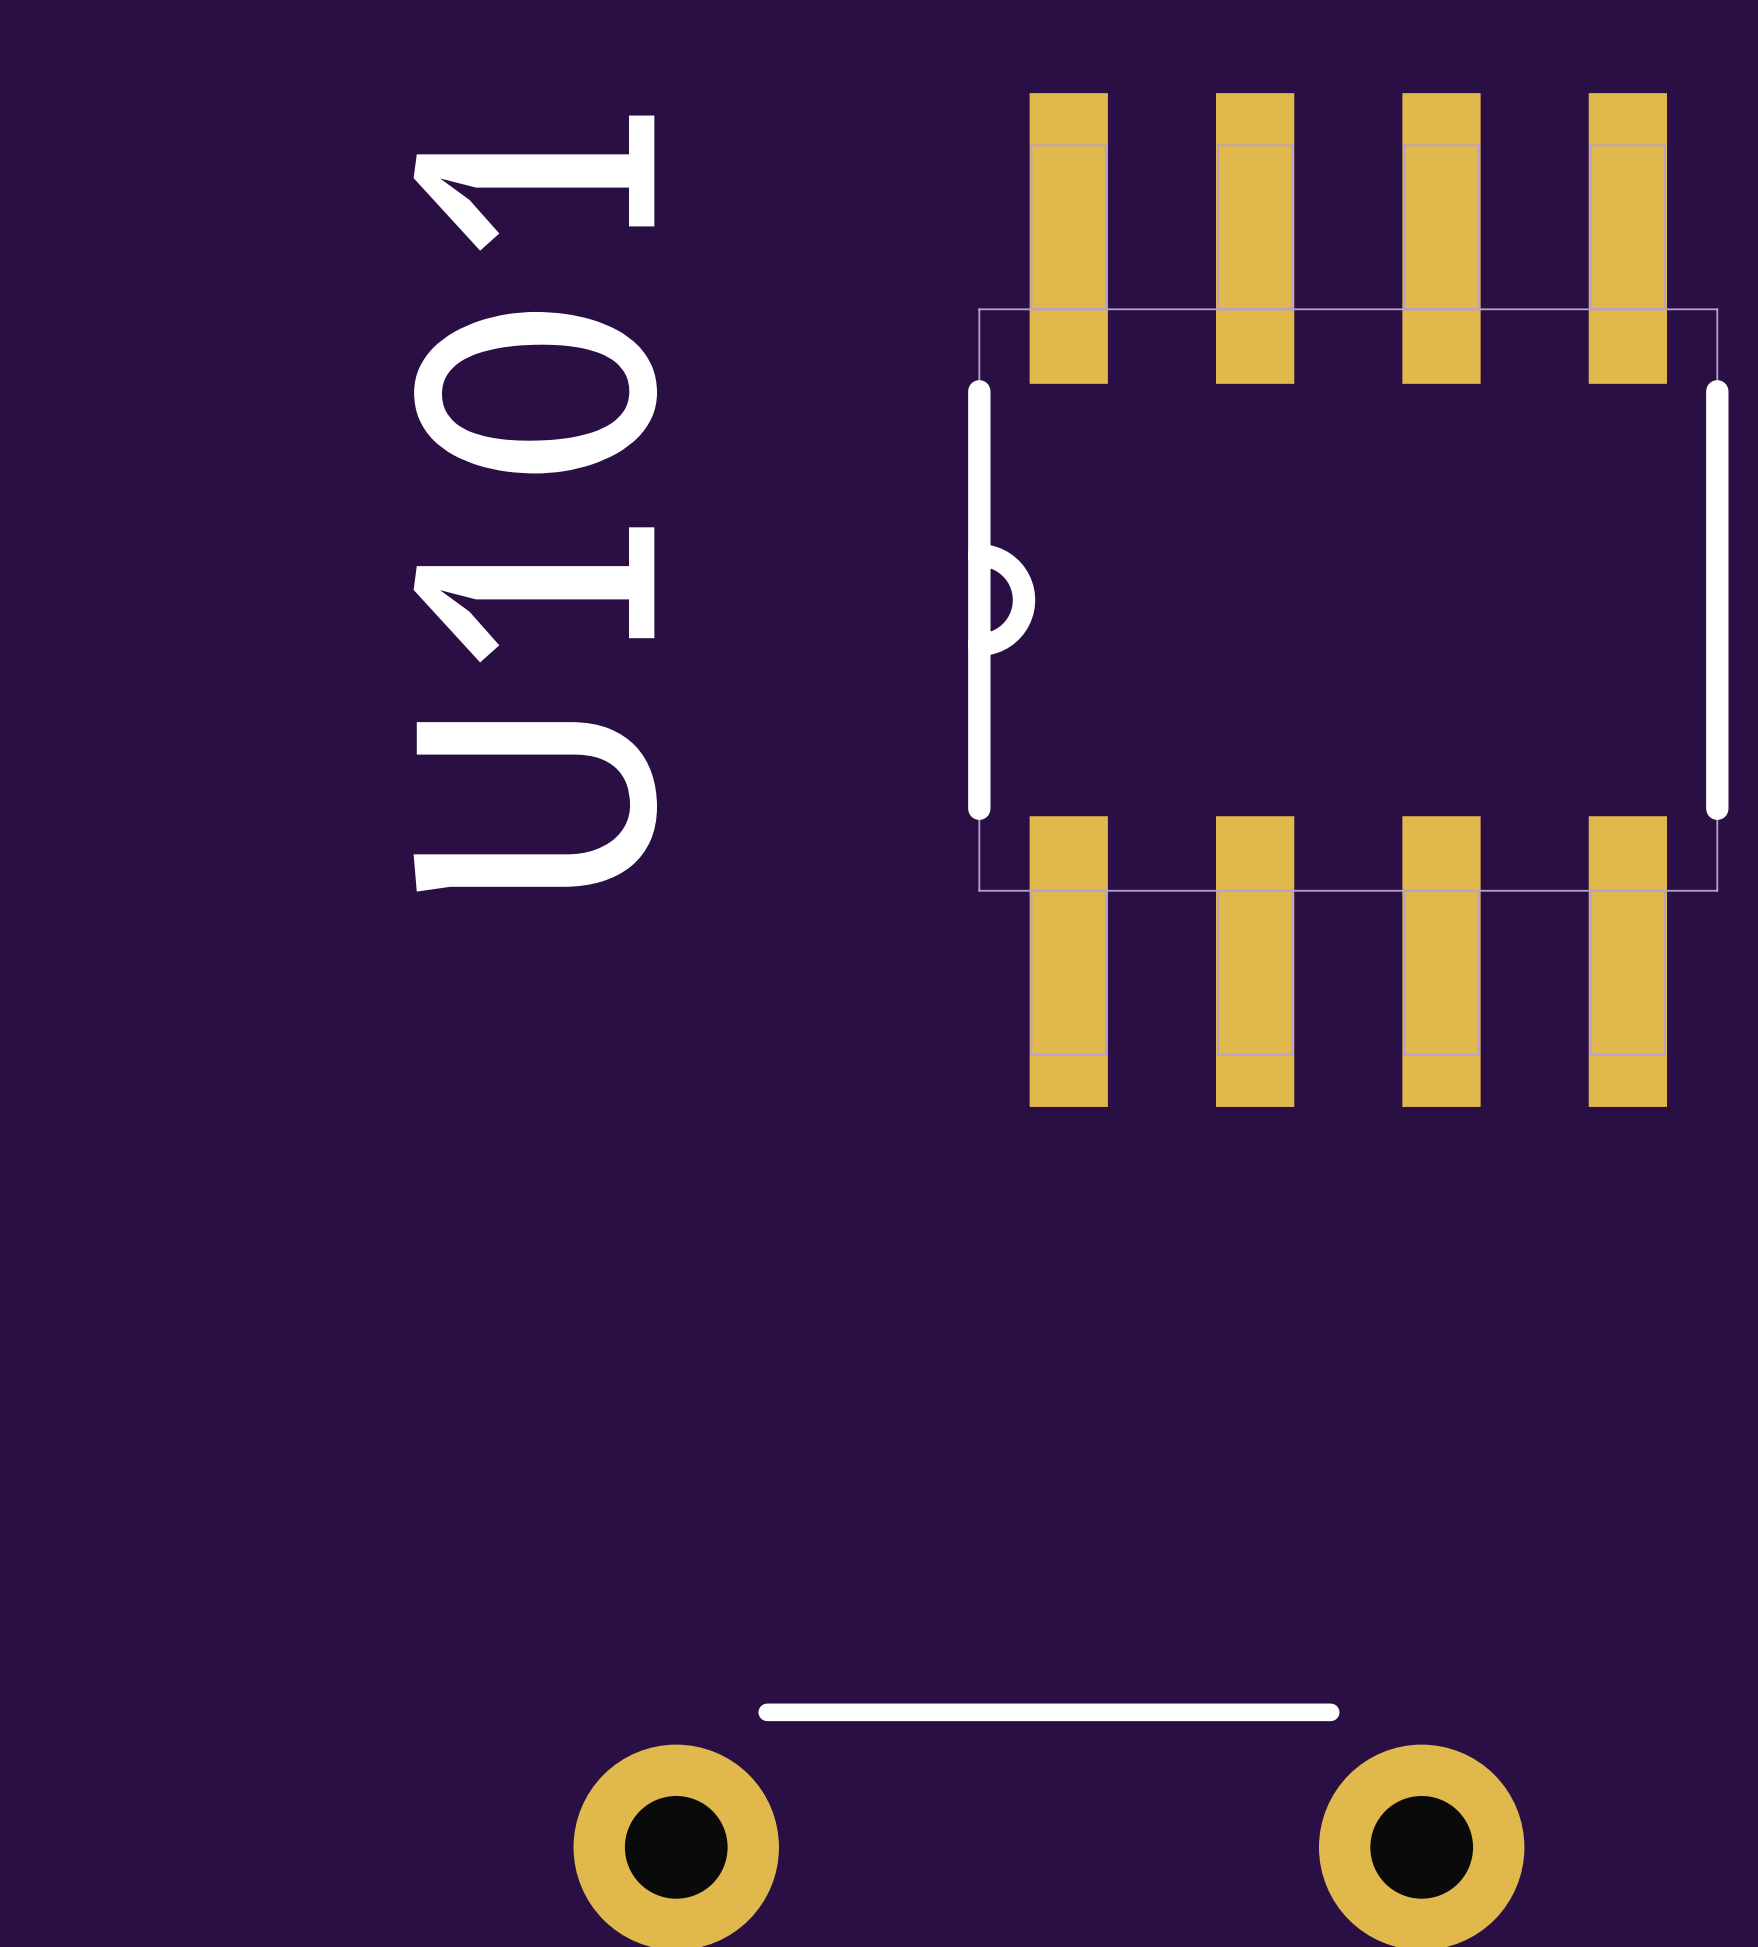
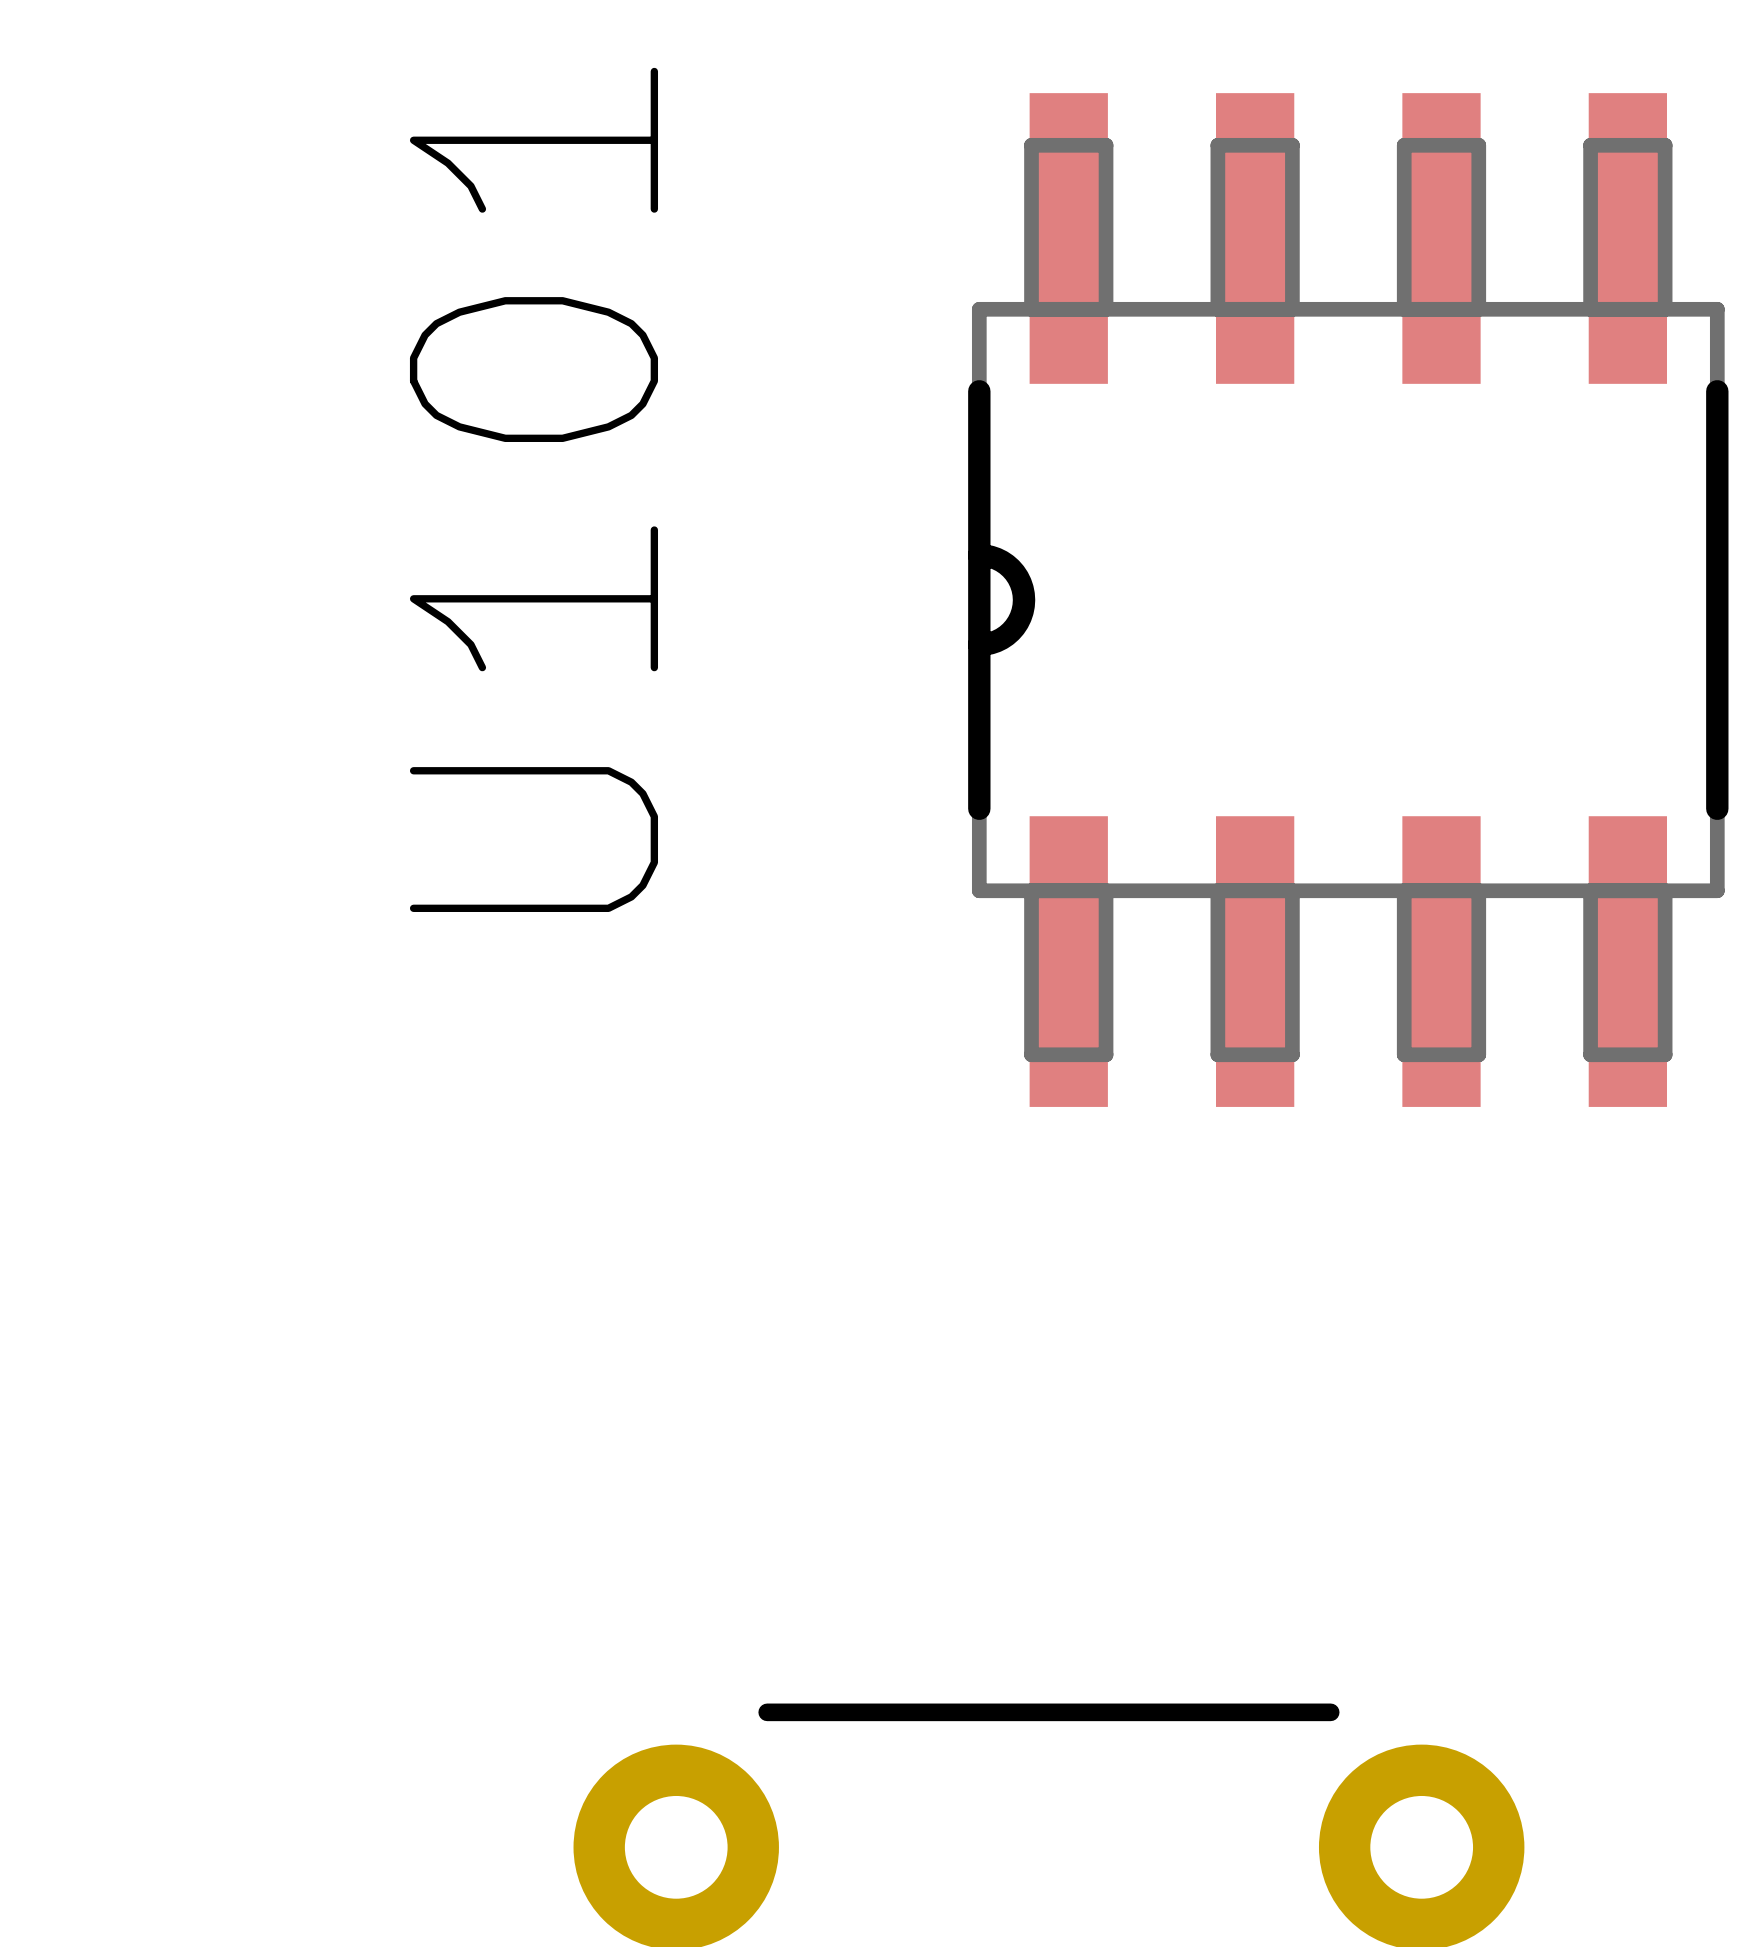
U101 footprint: [968, 93, 1729, 1107] -> [968, 93, 1729, 1107]

